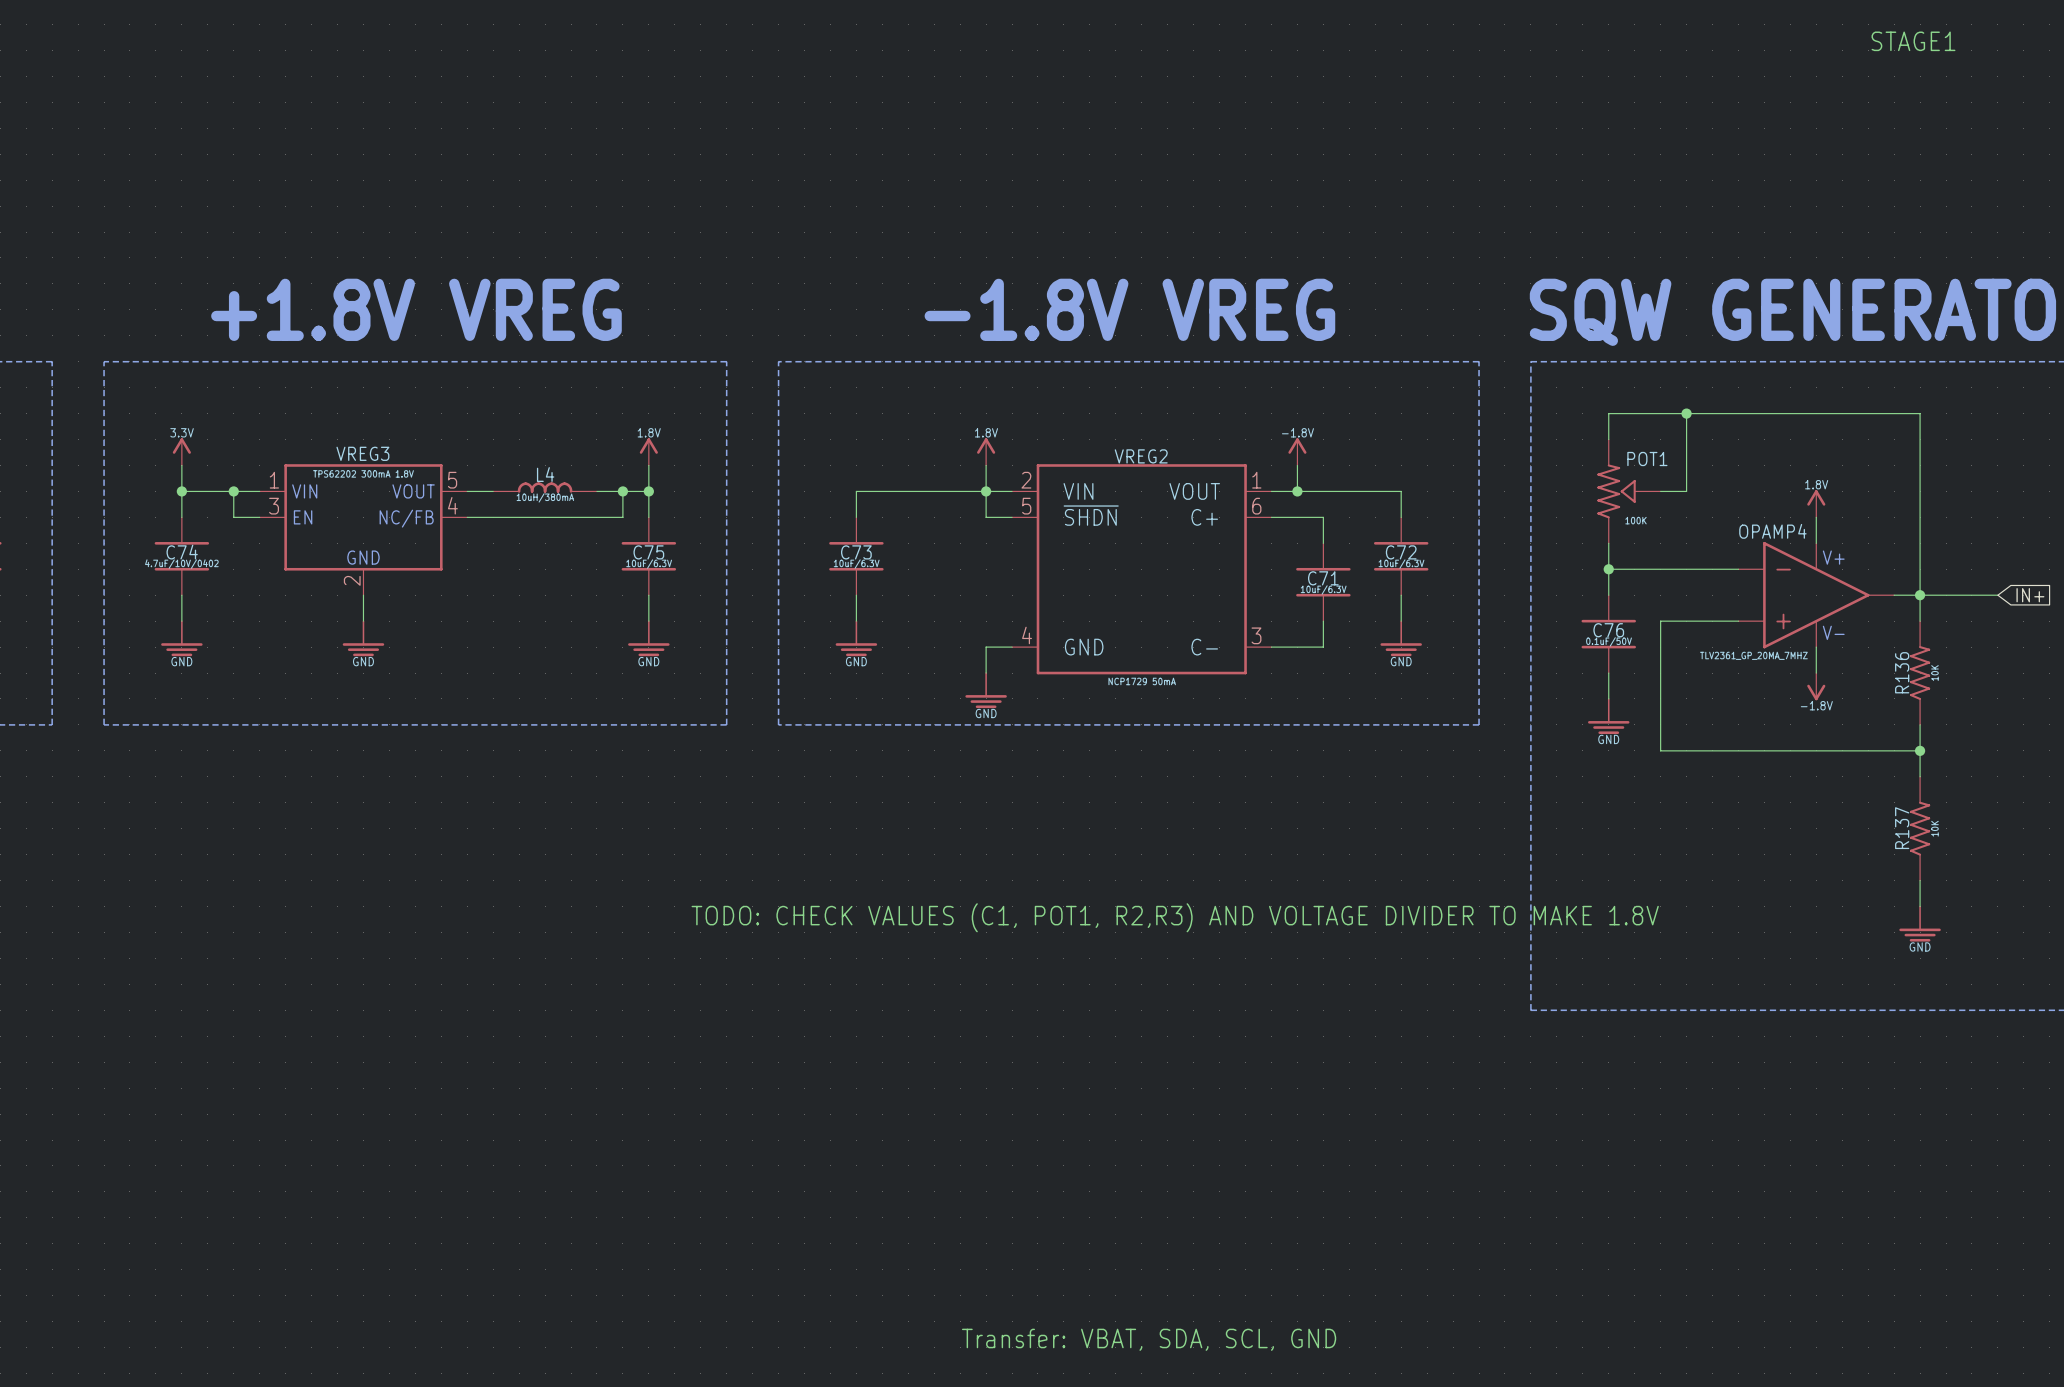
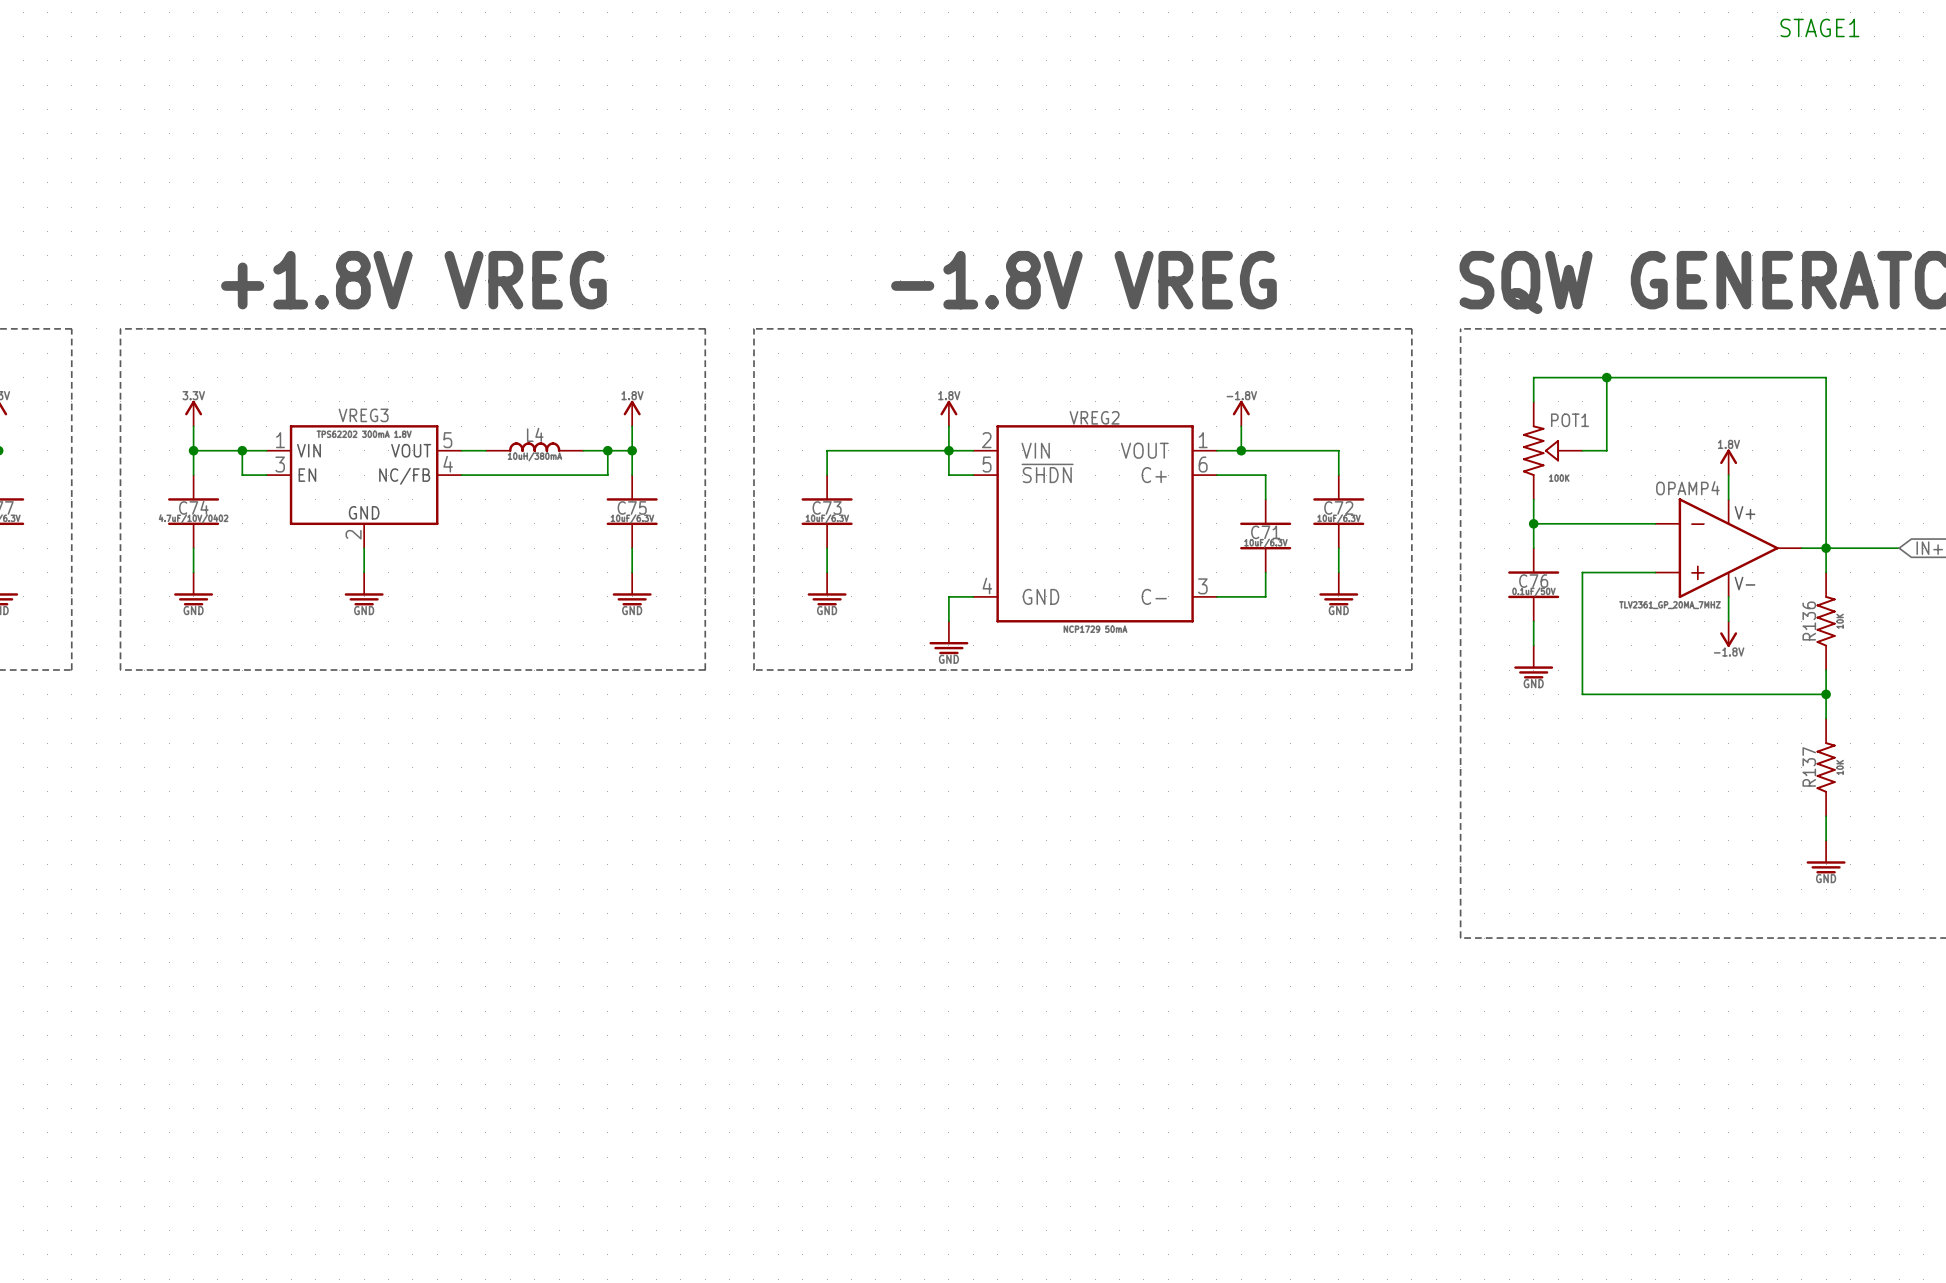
text: TODO: CHECK VALUES (C1, POT1, R2,R3) AND VOLTAGE DIVIDER TO MAKE 1.8V (1175, 917) -> none
text: Transfer: VBAT, SDA, SCL, GND (1149, 1339) -> none

